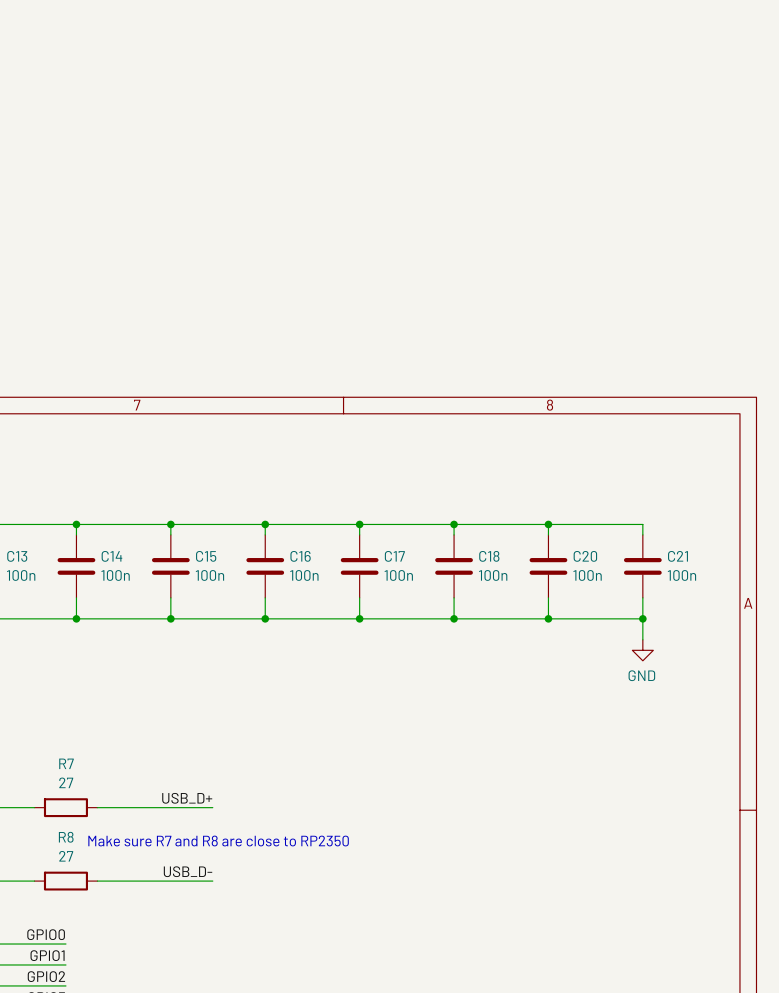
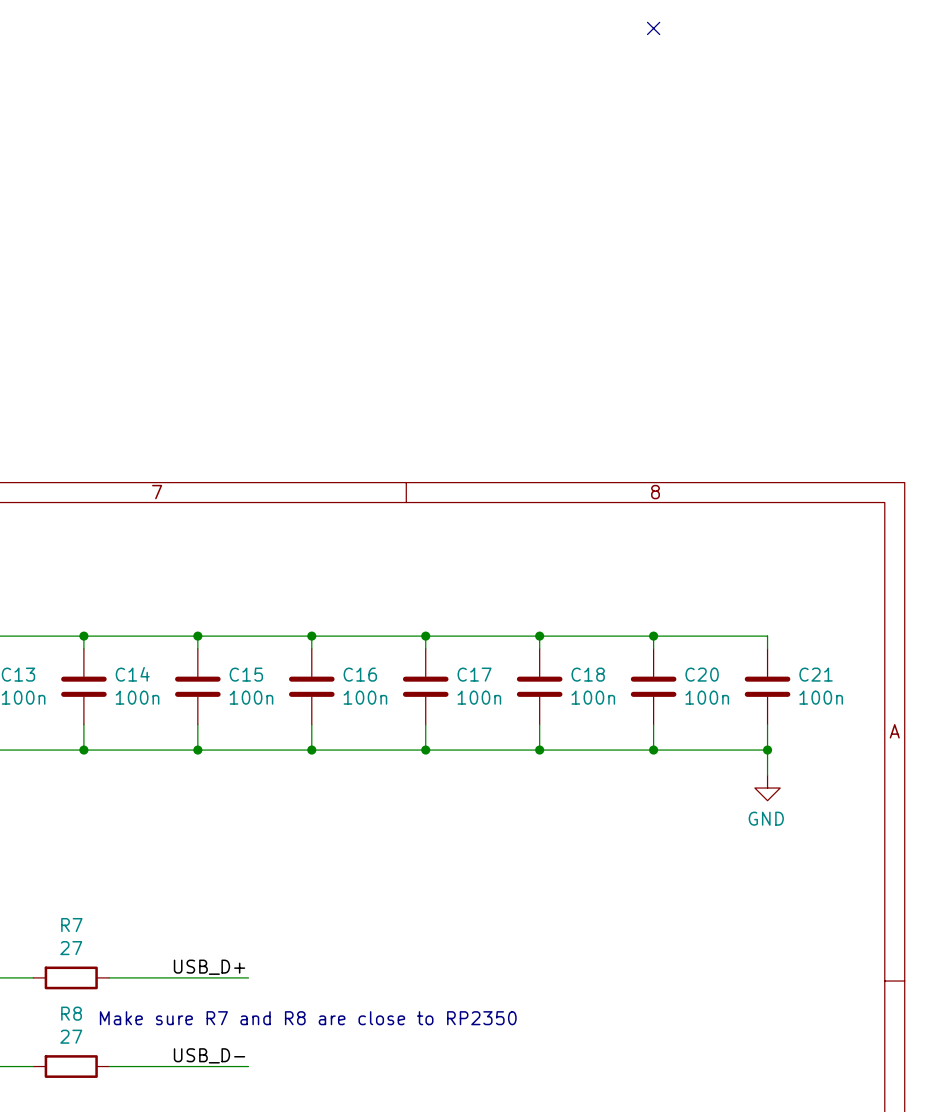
no-connect mark: none -> (653, 28)

